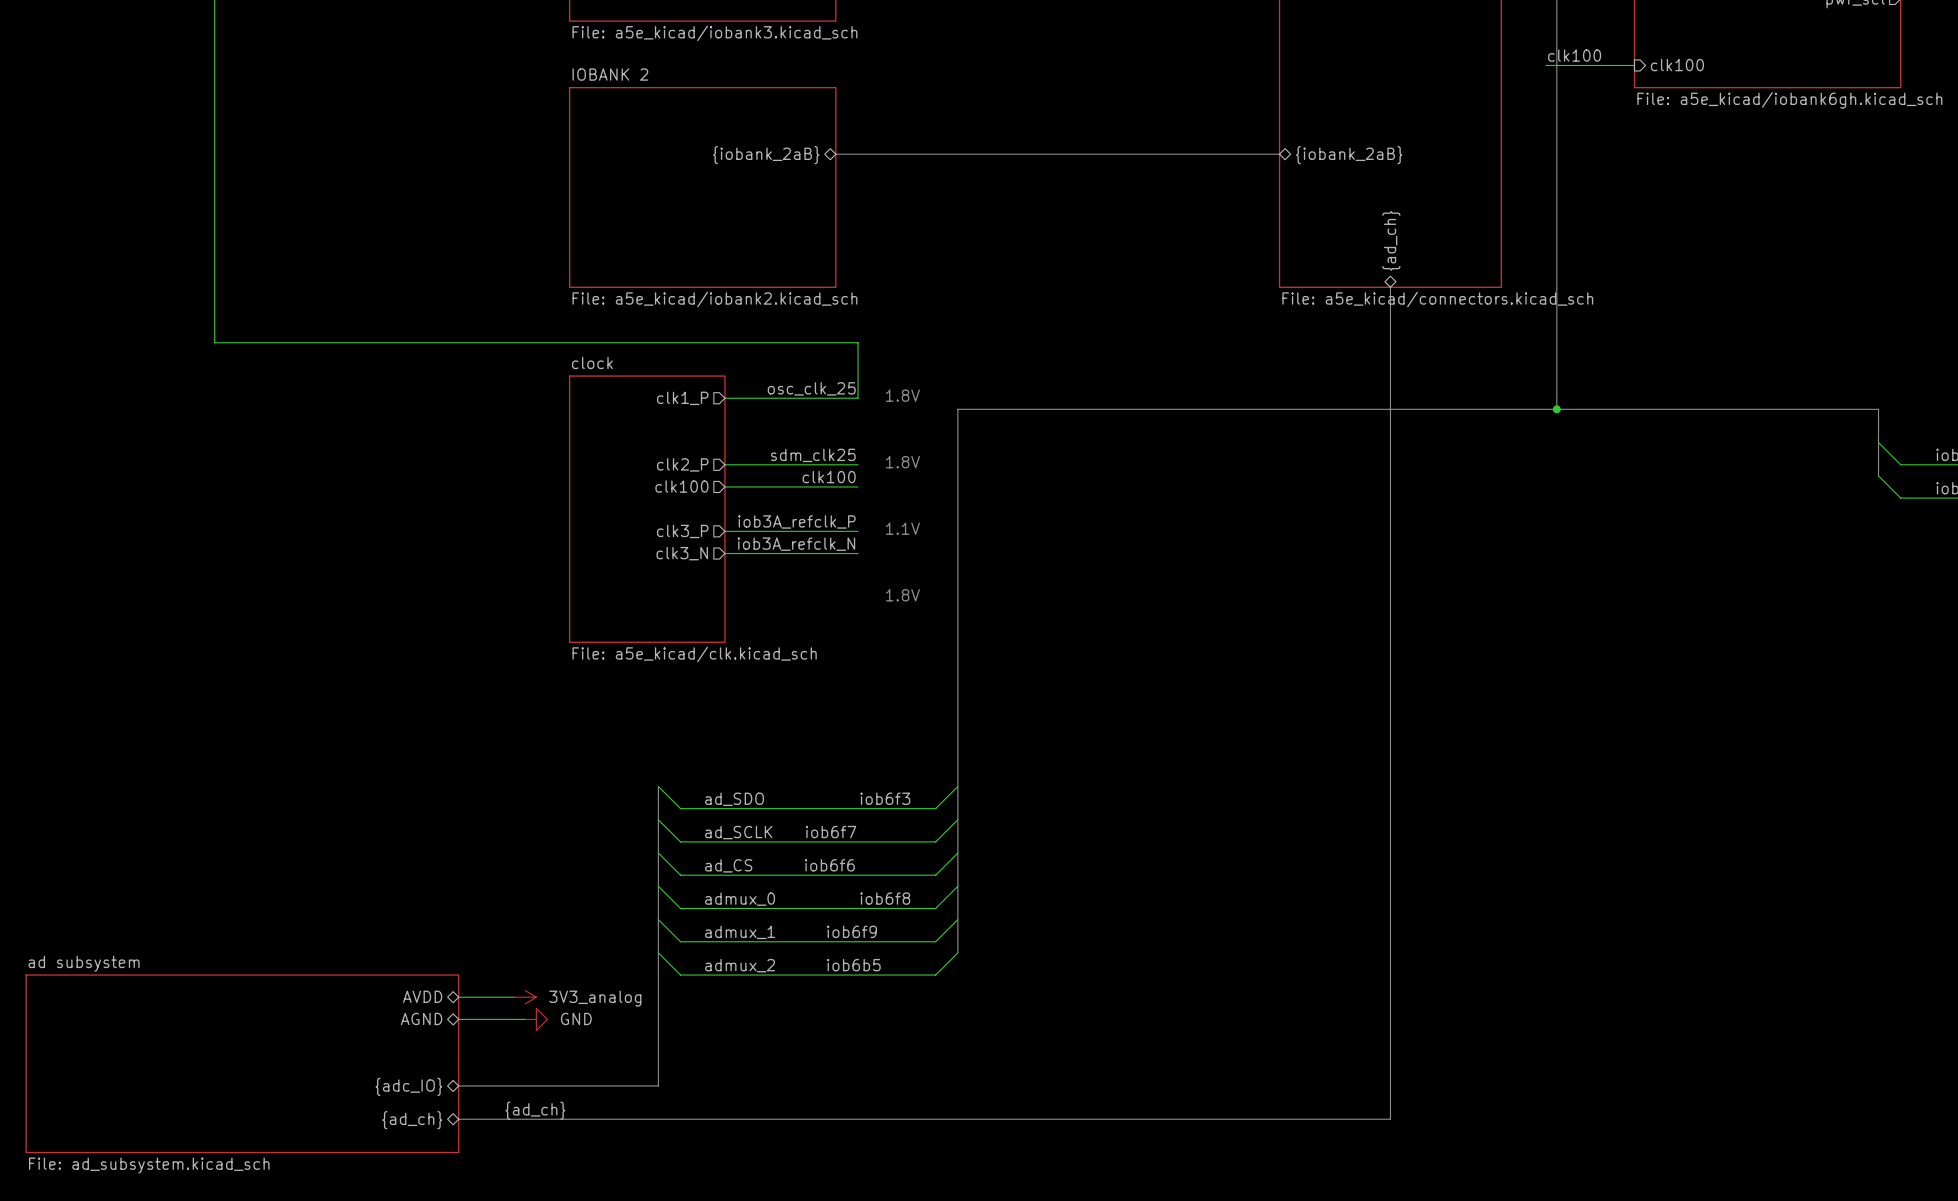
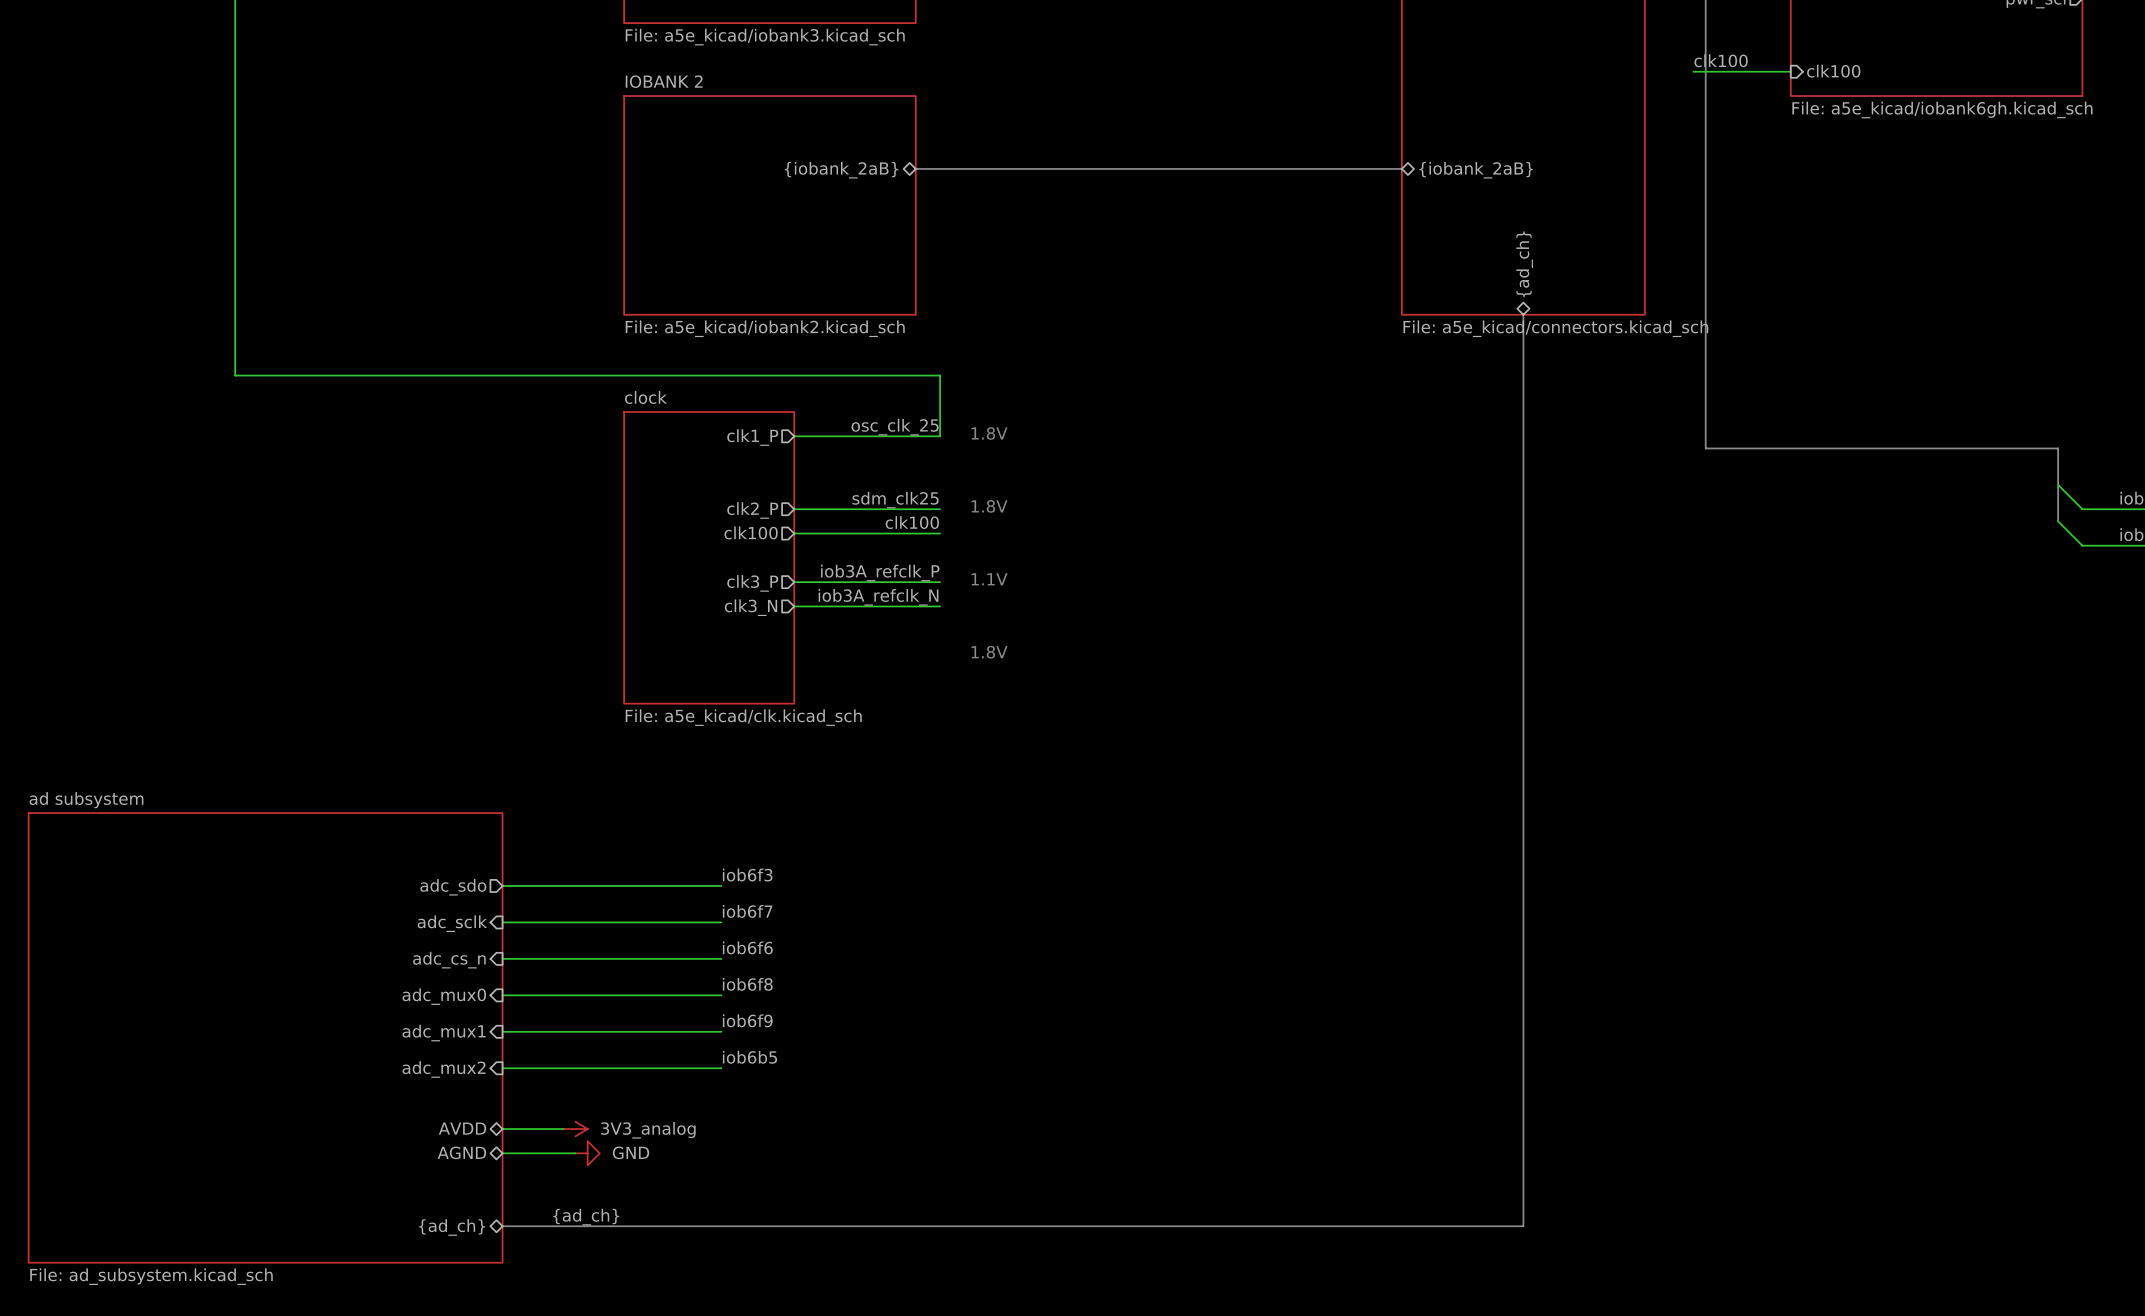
bus: (1556, 409) (957, 409) (957, 952) -> none
junction: (1556, 409) -> none
wire: (658, 786) (680, 808) (935, 808) (957, 786) -> none
bus: (658, 786) (658, 1085) (458, 1085) -> none
label position: iob6f3 (885, 798) -> iob6f3 (747, 874)
label: ad_SDO (734, 799) -> none
sheet pin: none -> adc_sdo (453, 887)
wire: none -> (502, 885) (721, 885)
wire: (658, 819) (680, 841) (935, 841) (957, 819) -> none
label: ad_SCLK (738, 832) -> none
label position: iob6f7 (831, 832) -> iob6f7 (747, 911)
wire: none -> (502, 922) (721, 922)
sheet pin: none -> adc_sclk (452, 923)
wire: (658, 853) (680, 875) (935, 875) (957, 853) -> none
label: ad_CS (728, 865) -> none
label position: iob6f6 (829, 865) -> iob6f6 (747, 947)
sheet pin: none -> adc_cs_n (449, 960)
wire: none -> (502, 958) (721, 958)
wire: (658, 886) (680, 908) (935, 908) (957, 886) -> none
label position: iob6f8 (885, 898) -> iob6f8 (747, 984)
label: admux_0 (740, 899) -> none
sheet pin: none -> adc_mux0 (444, 996)
wire: none -> (502, 995) (721, 995)
wire: (658, 919) (680, 941) (935, 941) (957, 919) -> none
label position: iob6f9 (852, 931) -> iob6f9 (747, 1020)
label: admux_1 (740, 932) -> none
sheet pin: none -> adc_mux1 (444, 1033)
wire: none -> (502, 1031) (721, 1031)
sheet ad subsystem: none -> File: ad_subsystem.kicad_sch (265, 1037)
wire: (658, 952) (680, 975) (935, 975) (957, 952) -> none
label: admux_2 (740, 965) -> none
label position: iob6b5 (853, 965) -> iob6b5 (749, 1057)
sheet pin: none -> adc_mux2 (444, 1069)
wire: none -> (502, 1068) (721, 1068)
sheet pin position: AVDD (422, 996) -> AVDD (462, 1128)
wire: (458, 997) (514, 997) -> (502, 1129) (563, 1129)
power symbol position: 3V3_analog (525, 997) -> 3V3_analog (575, 1129)
sheet pin position: AGND (421, 1018) -> AGND (461, 1152)
wire: (458, 1019) (525, 1019) -> (502, 1153) (575, 1153)
power symbol position: GND (536, 1019) -> GND (587, 1153)
sheet ad subsystem: File: ad_subsystem.kicad_sch (242, 1063) -> none
sheet pin: {adc_IO} (408, 1086) -> none

